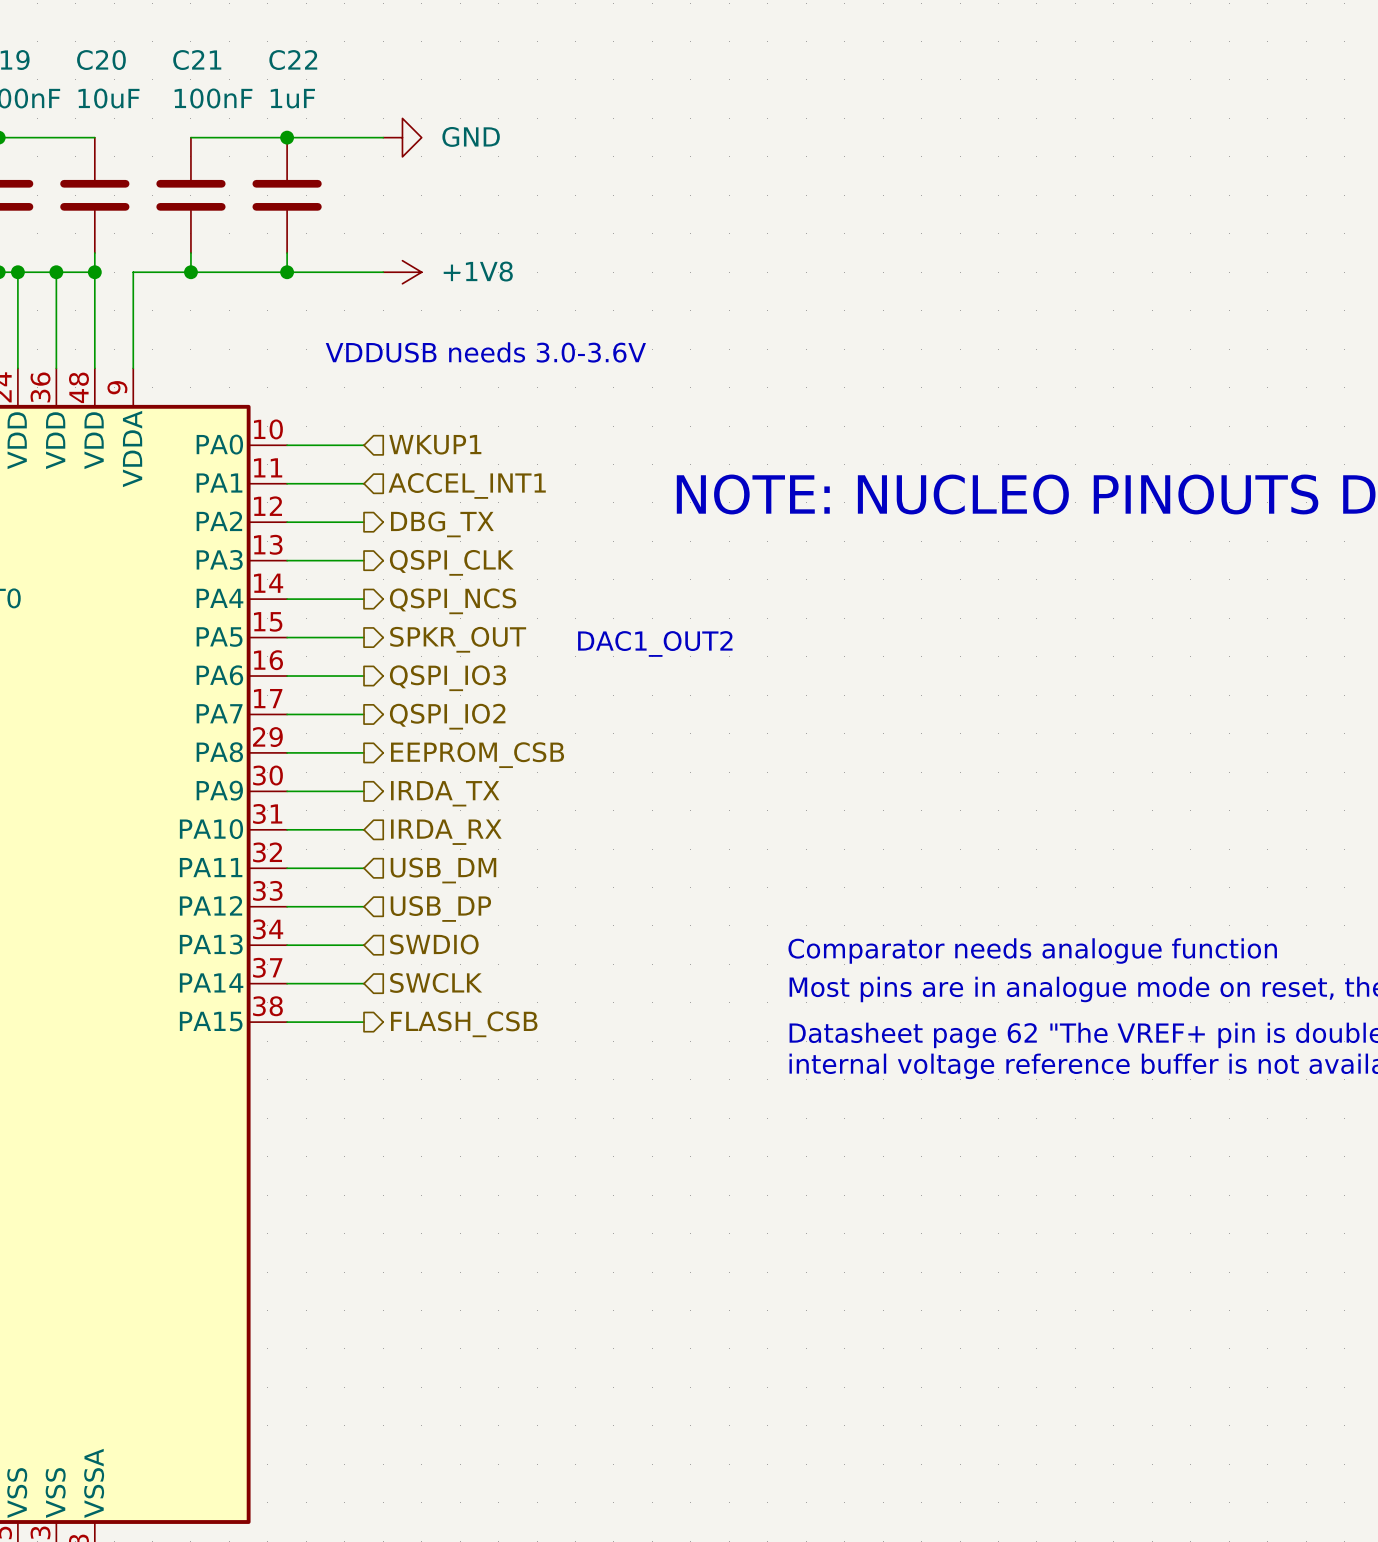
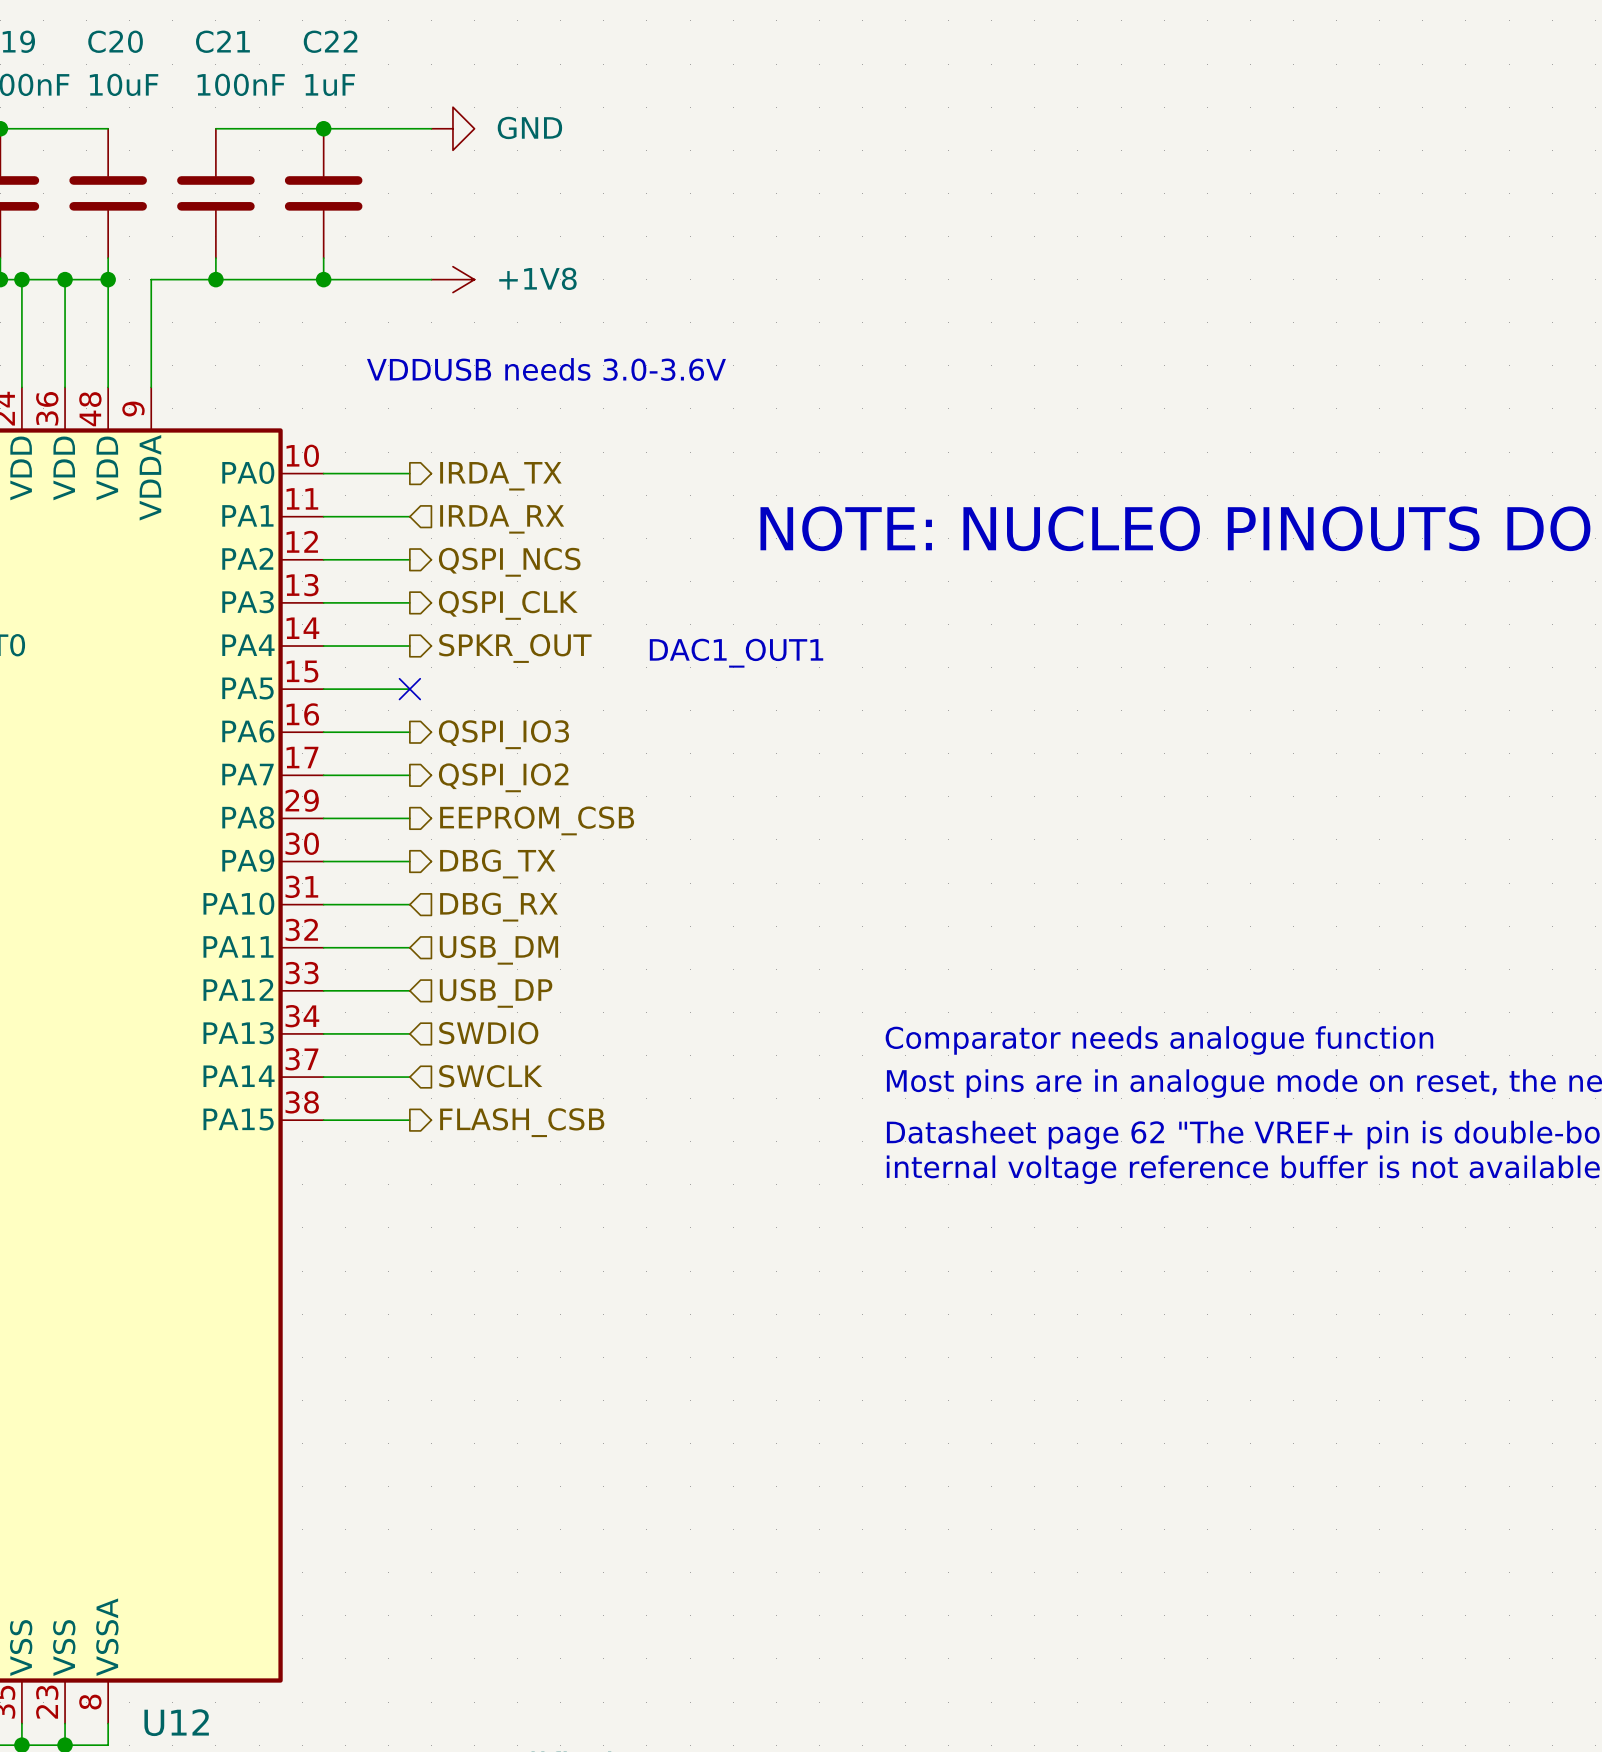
hierarchical label shape: input (435, 444) -> output (500, 476)
hierarchical label: WKUP1 (435, 444) -> IRDA_TX (500, 476)
hierarchical label: ACCEL_INT1 (467, 485) -> IRDA_RX (502, 519)
hierarchical label: DBG_TX (442, 524) -> QSPI_NCS (509, 562)
hierarchical label: QSPI_NCS (453, 601) -> SPKR_OUT (515, 648)
no-connect mark: none -> (409, 689)
hierarchical label: SPKR_OUT (458, 639) -> none
text: DAC1_OUT2 (655, 643) -> DAC1_OUT1 (736, 653)
hierarchical label: IRDA_TX (445, 793) -> DBG_TX (497, 864)
hierarchical label: IRDA_RX (446, 832) -> DBG_RX (498, 907)

